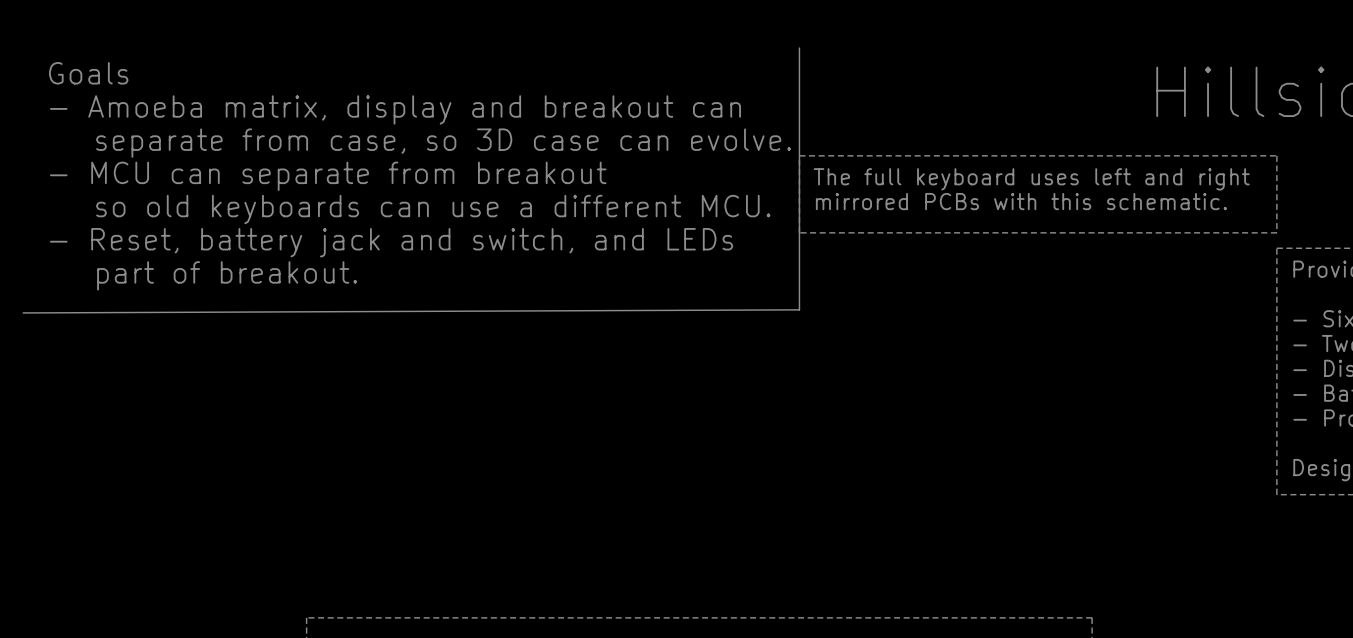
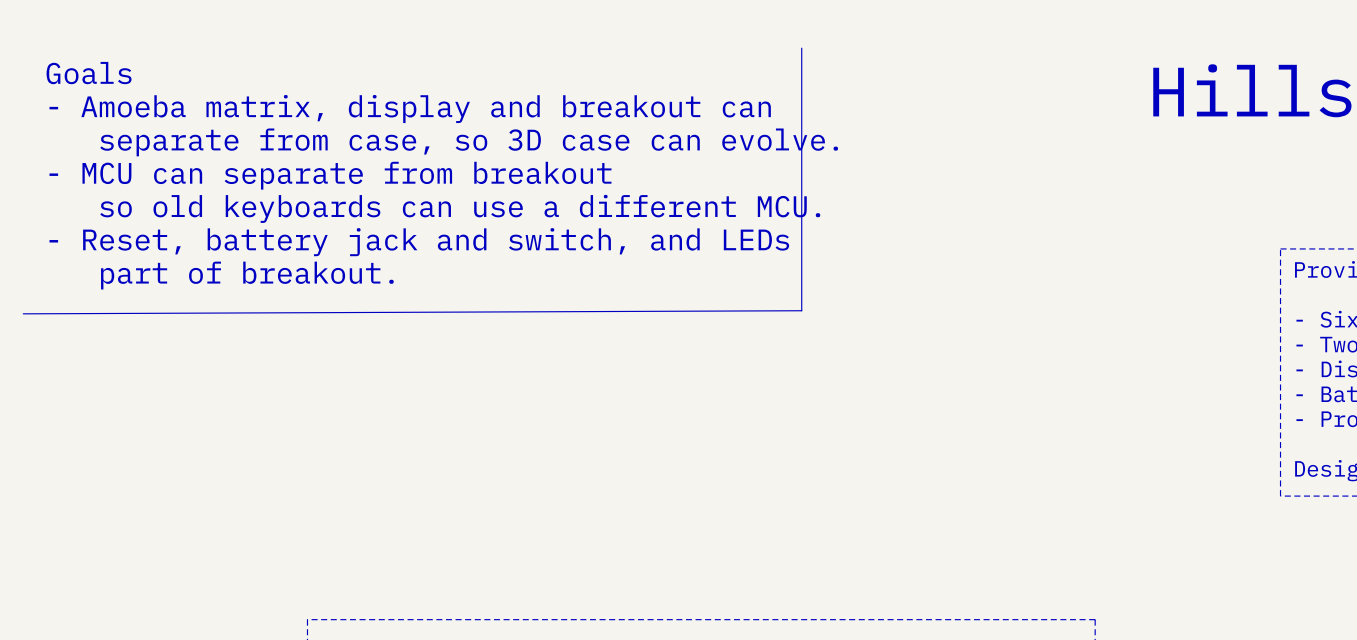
line: (799, 155) (1276, 155) (1276, 232) (799, 232) (799, 155) -> none
text: The full keyboard uses left and right (1031, 179) -> none
text: mirrored PCBs with this schematic. (1021, 201) -> none

